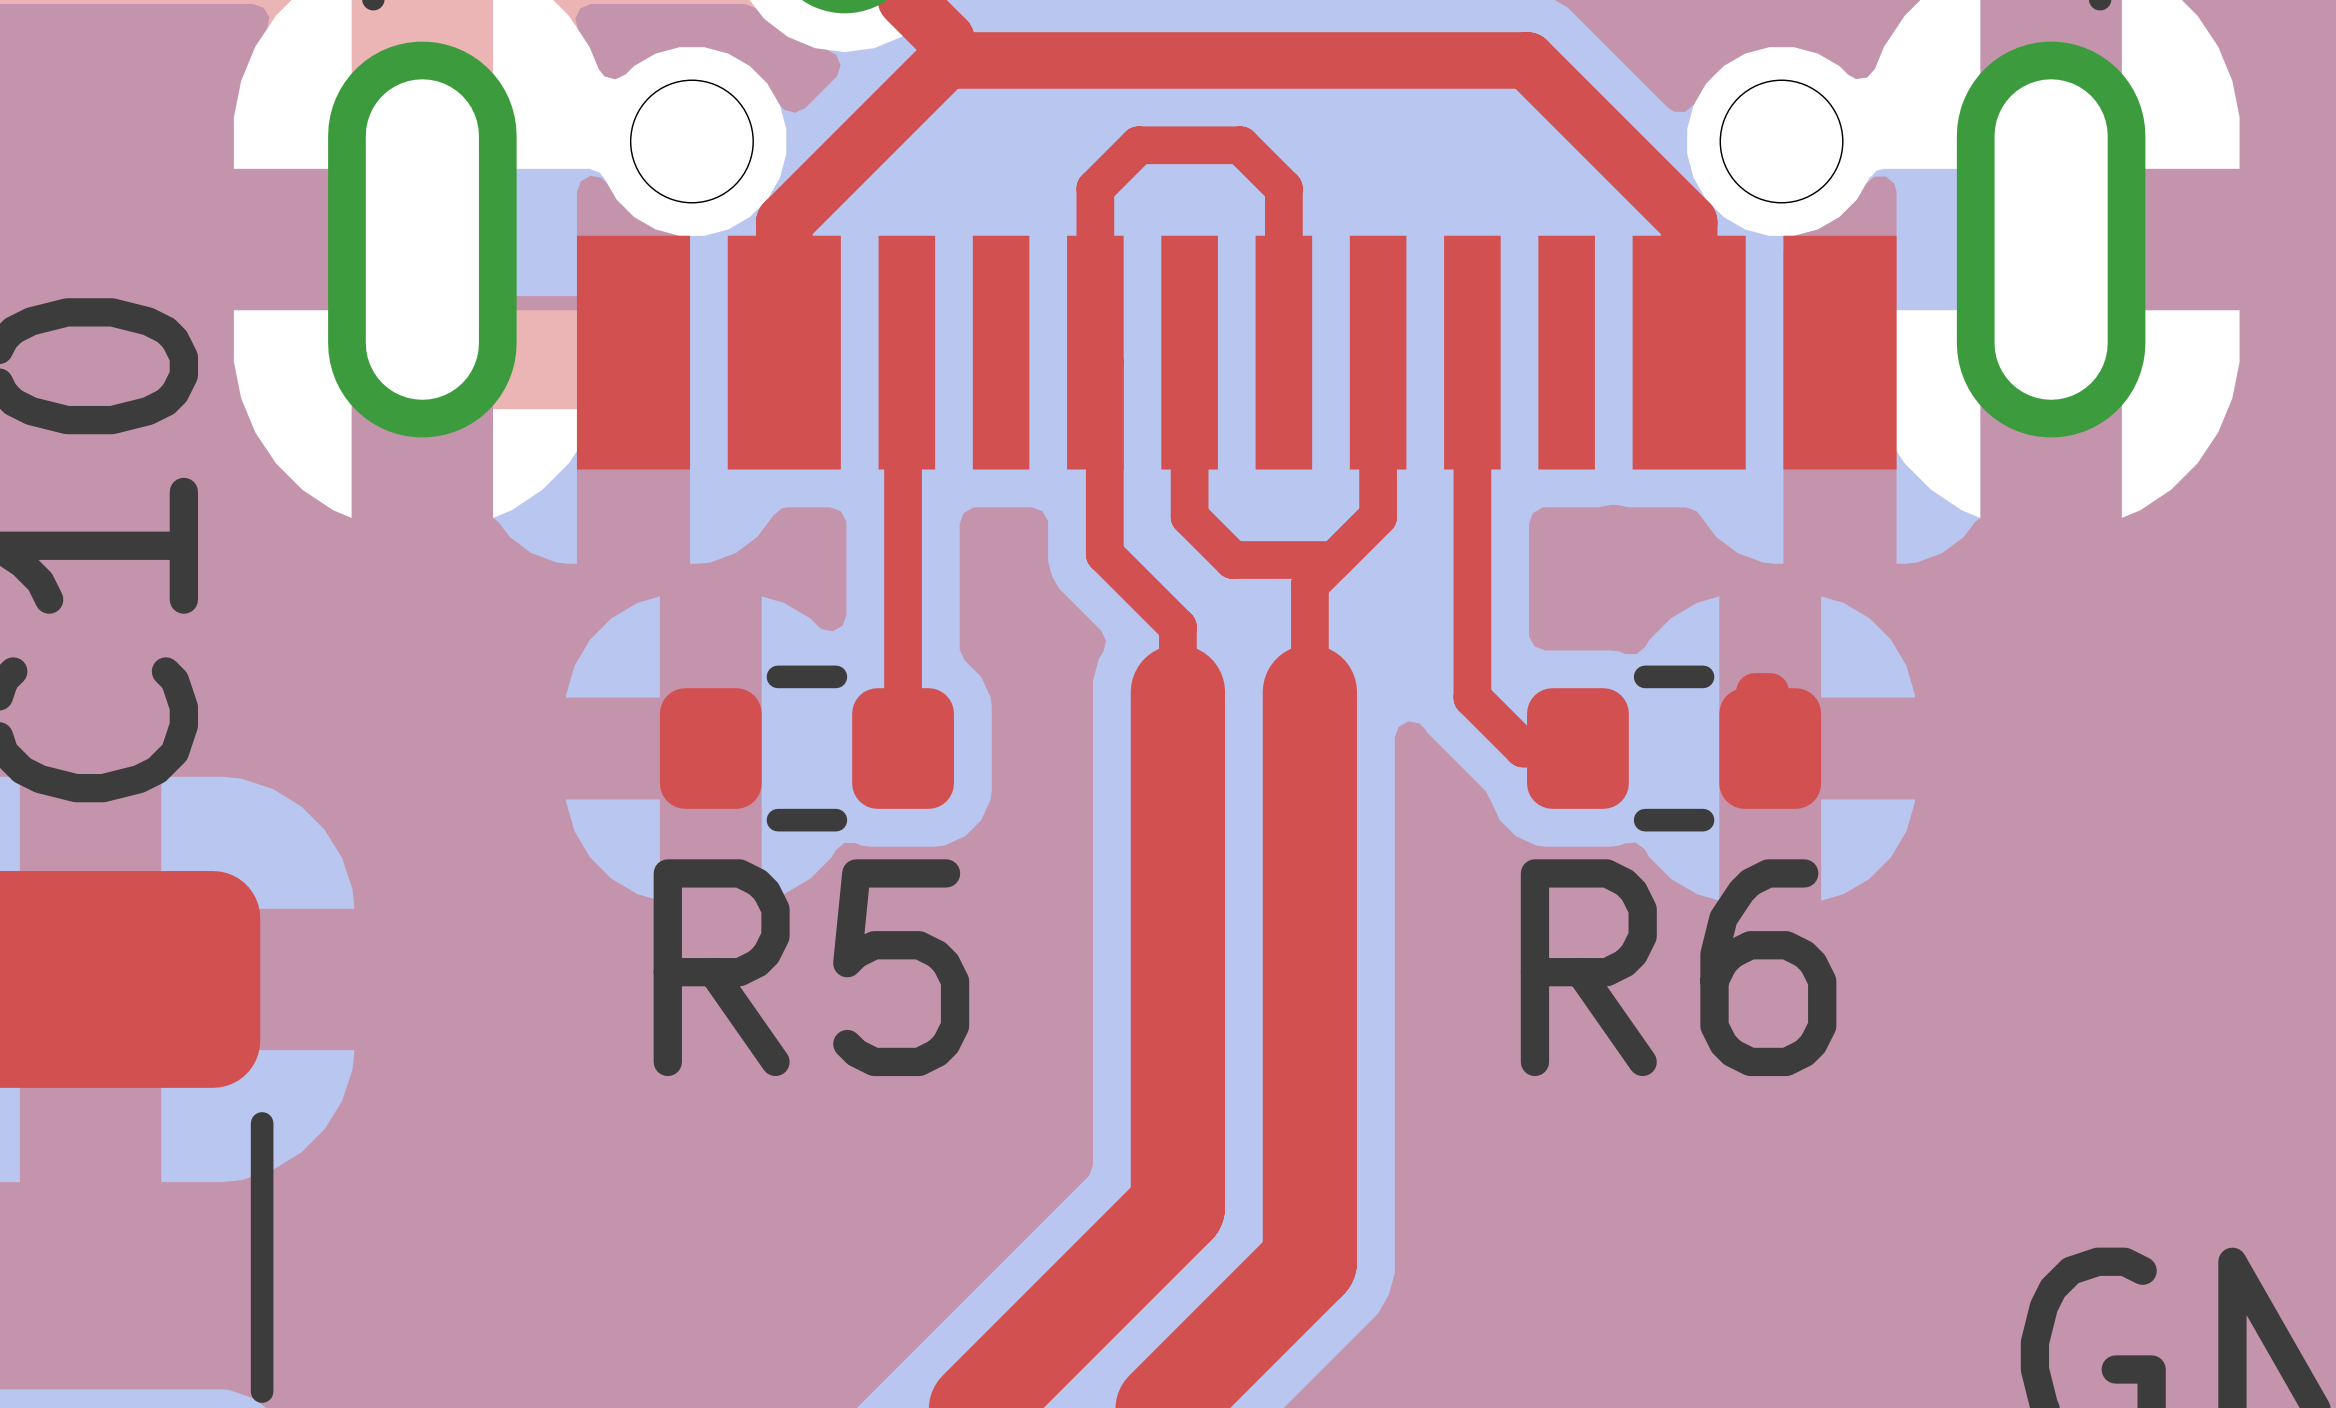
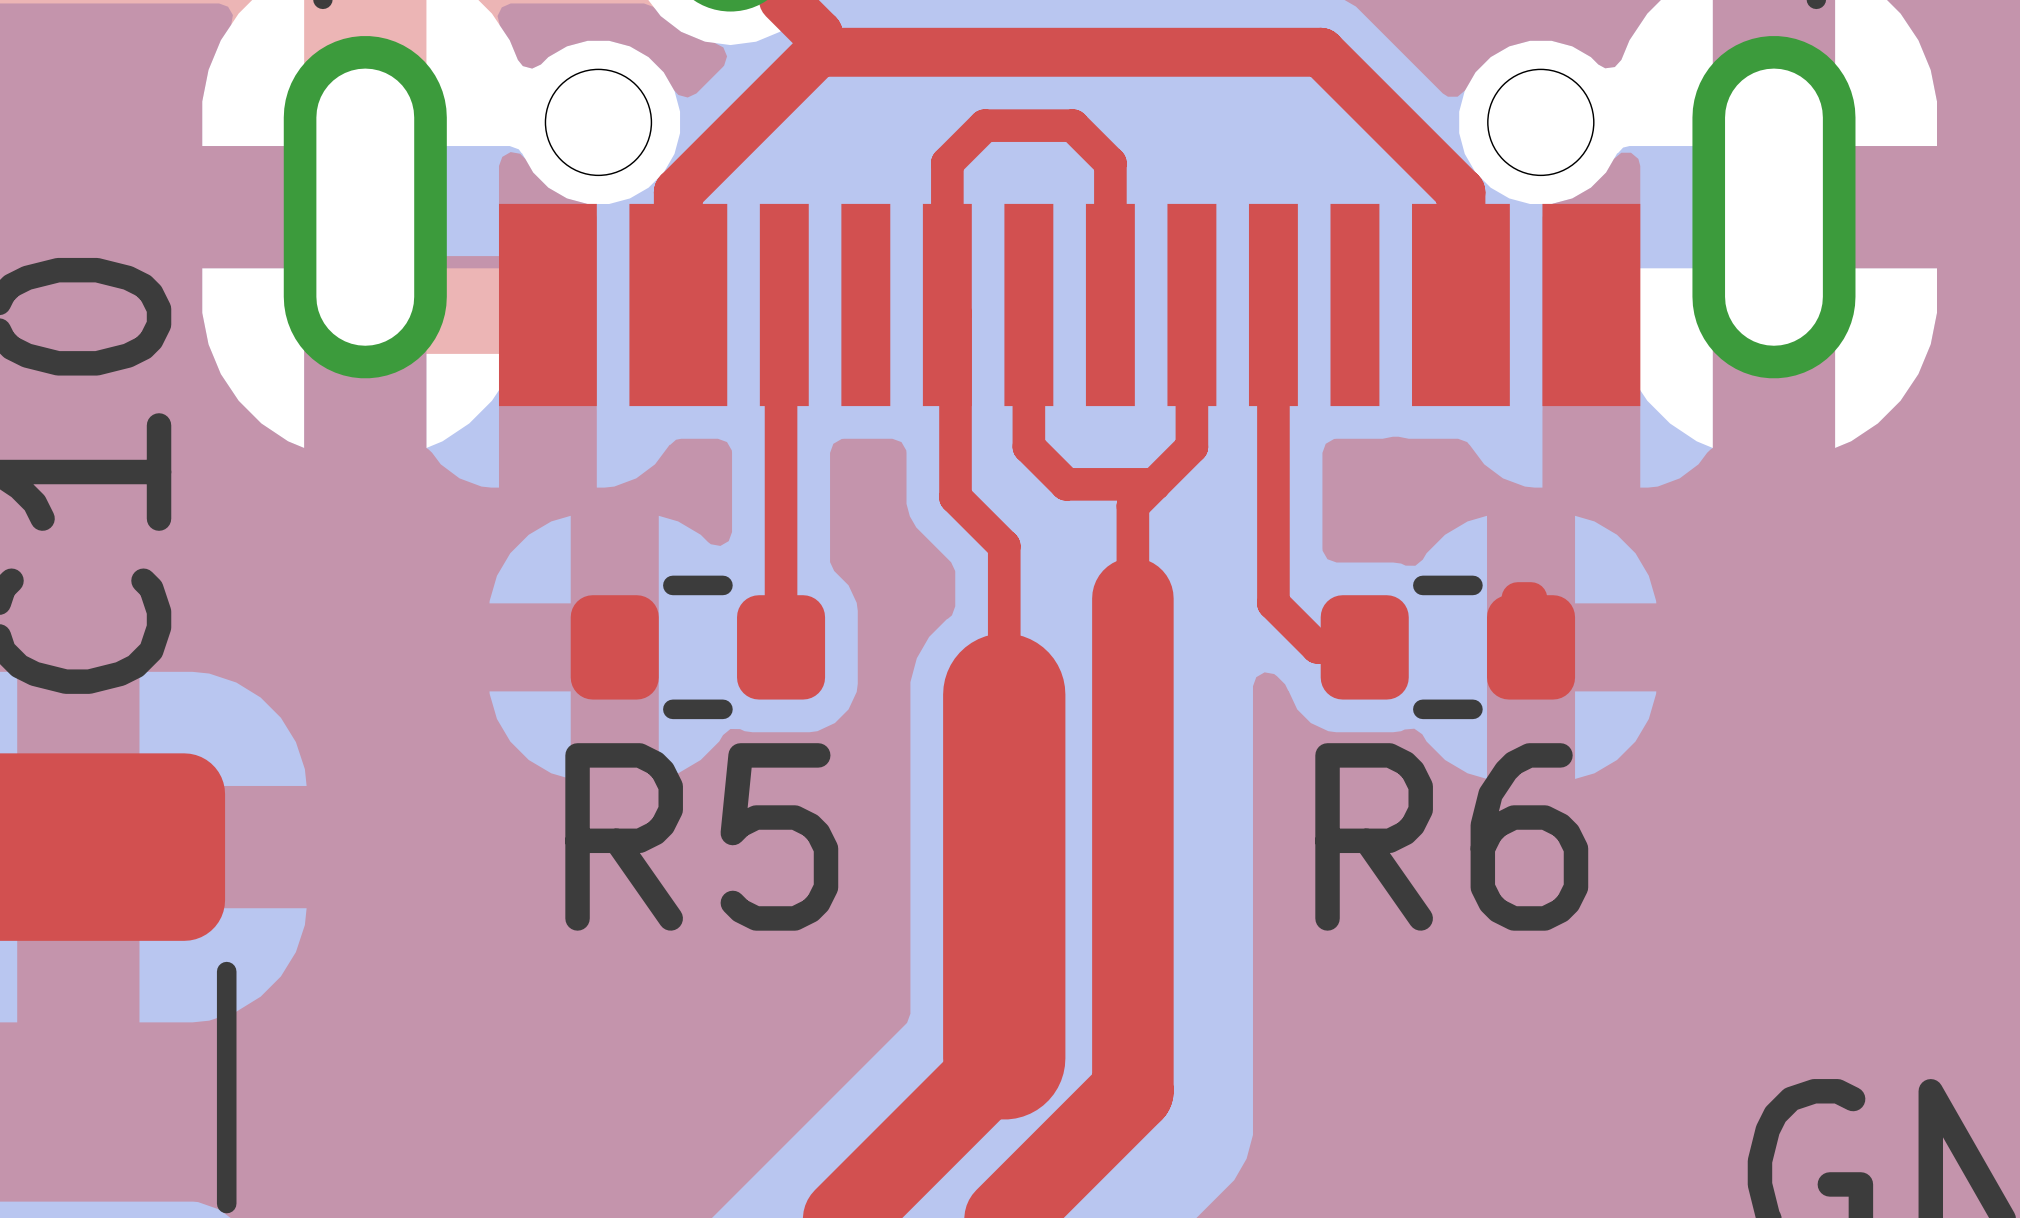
top track: (1104, 554) (1177, 627) (1177, 1206) (1161, 1223) -> (955, 479) (955, 497) (1004, 546) (1004, 1058)

